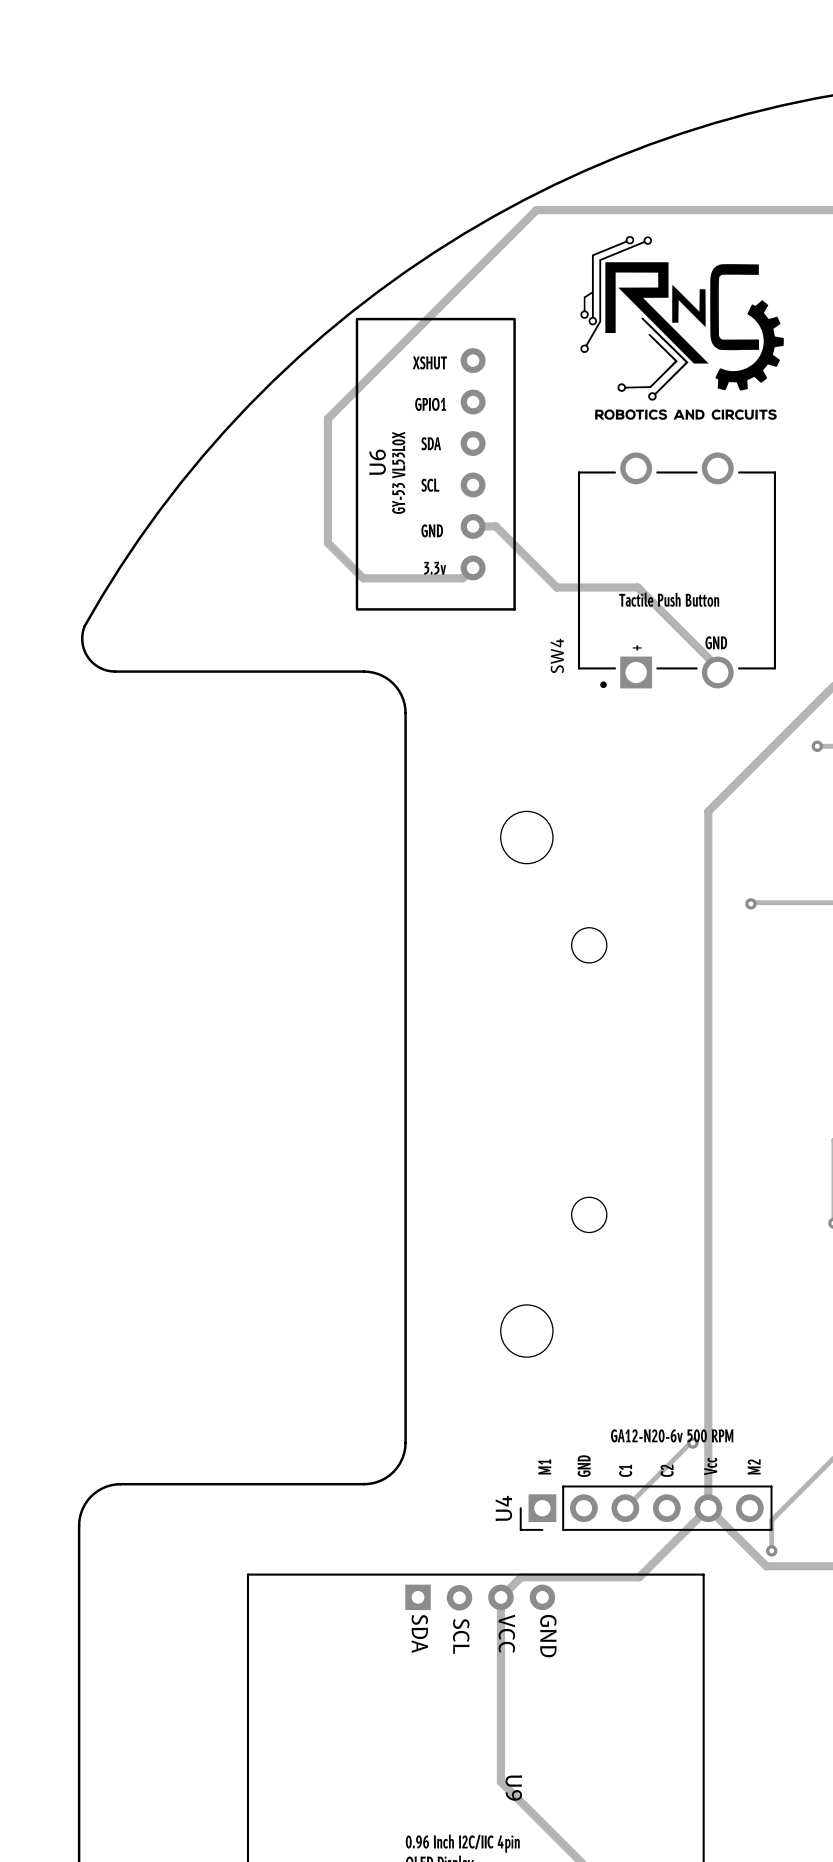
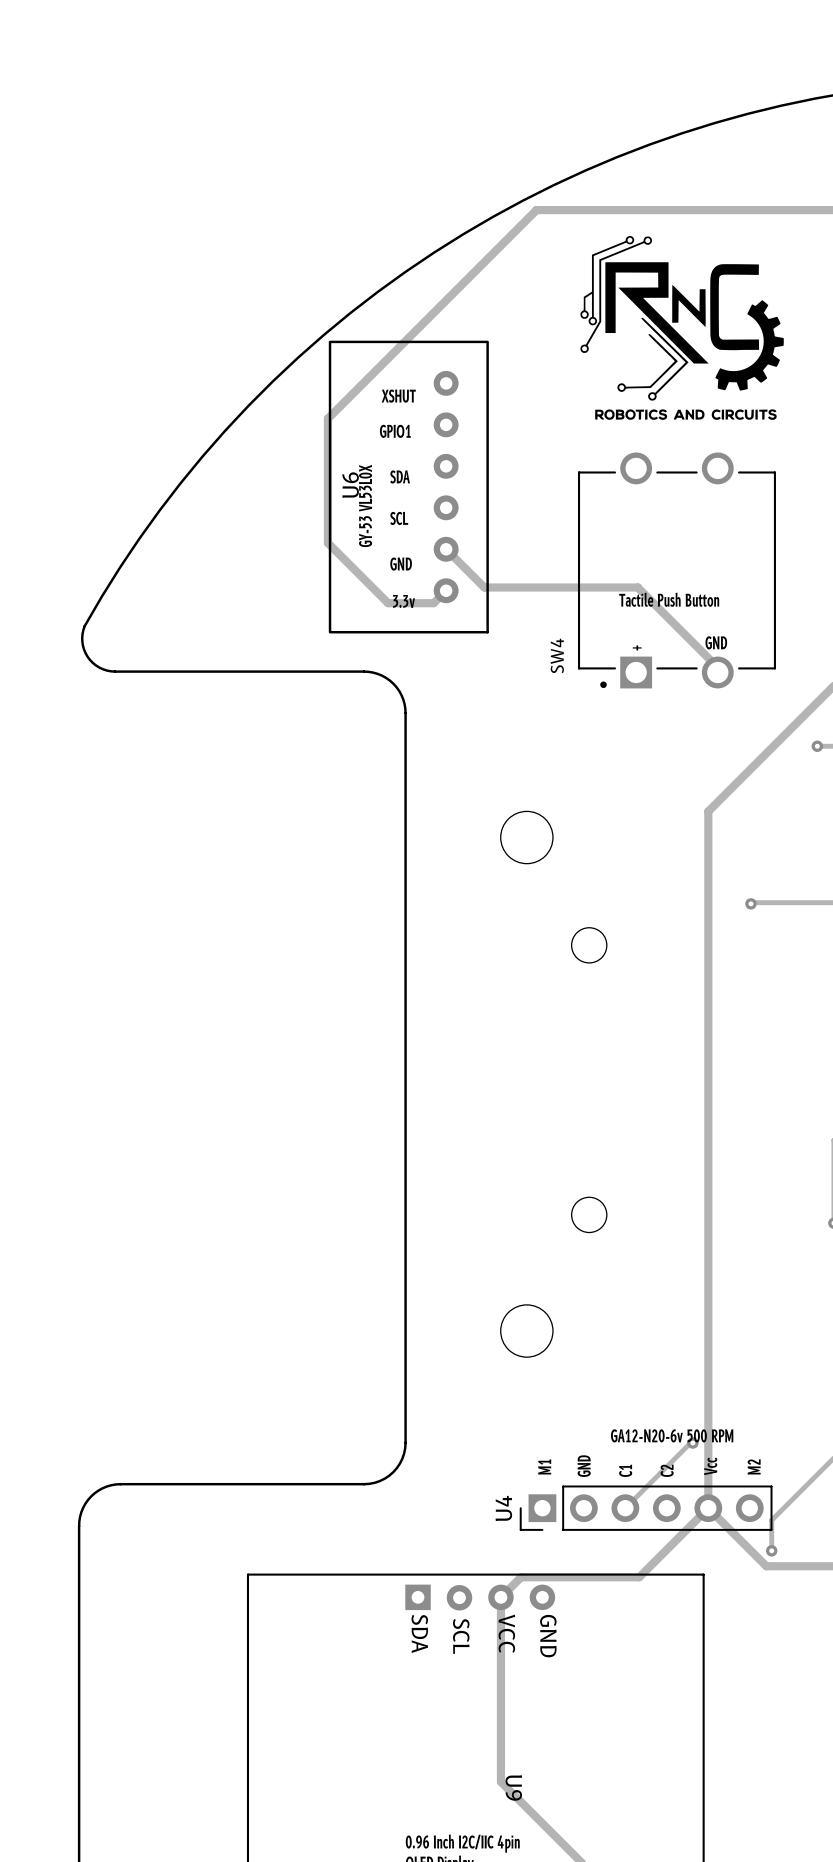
text position: XSHUT (429, 362) -> XSHUT (398, 396)
text position: GPIO1 (430, 404) -> GPIO1 (395, 431)
text position: SDA (431, 443) -> SDA (400, 476)
U6 position: (435, 464) -> (408, 487)
text position: GY-53 VL53L0X (398, 472) -> GY-53 VL53L0X (365, 506)
text position: SCL (430, 485) -> SCL (399, 518)
track: (473, 526) (495, 526) (556, 587) -> (446, 549) (484, 587) (556, 587)
text position: GND (432, 530) -> GND (401, 564)
track: (473, 567) (462, 578) (363, 578) -> (446, 590) (433, 603) (388, 603) (363, 578)
text position: 3.3v (435, 568) -> 3.3v (404, 601)

